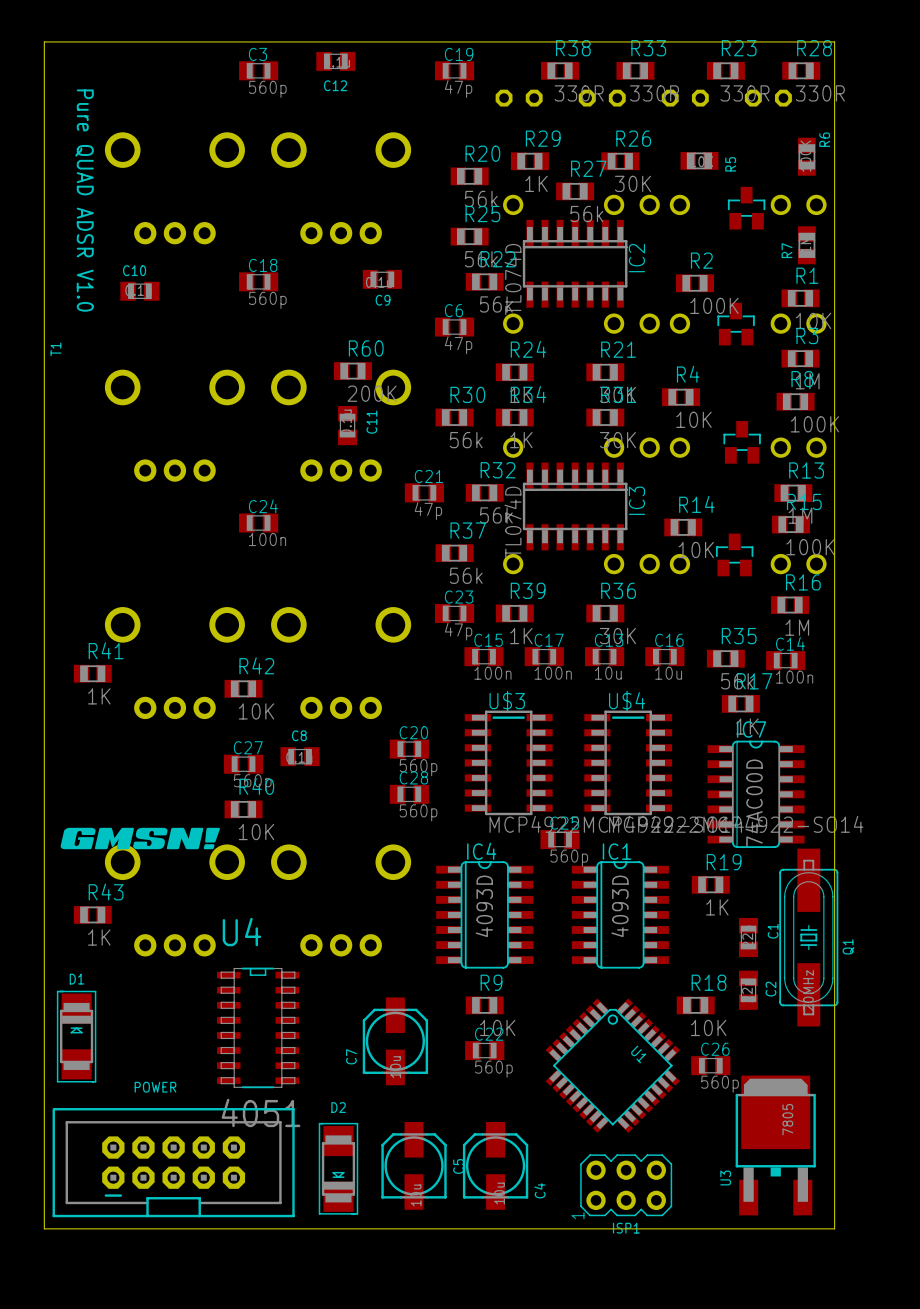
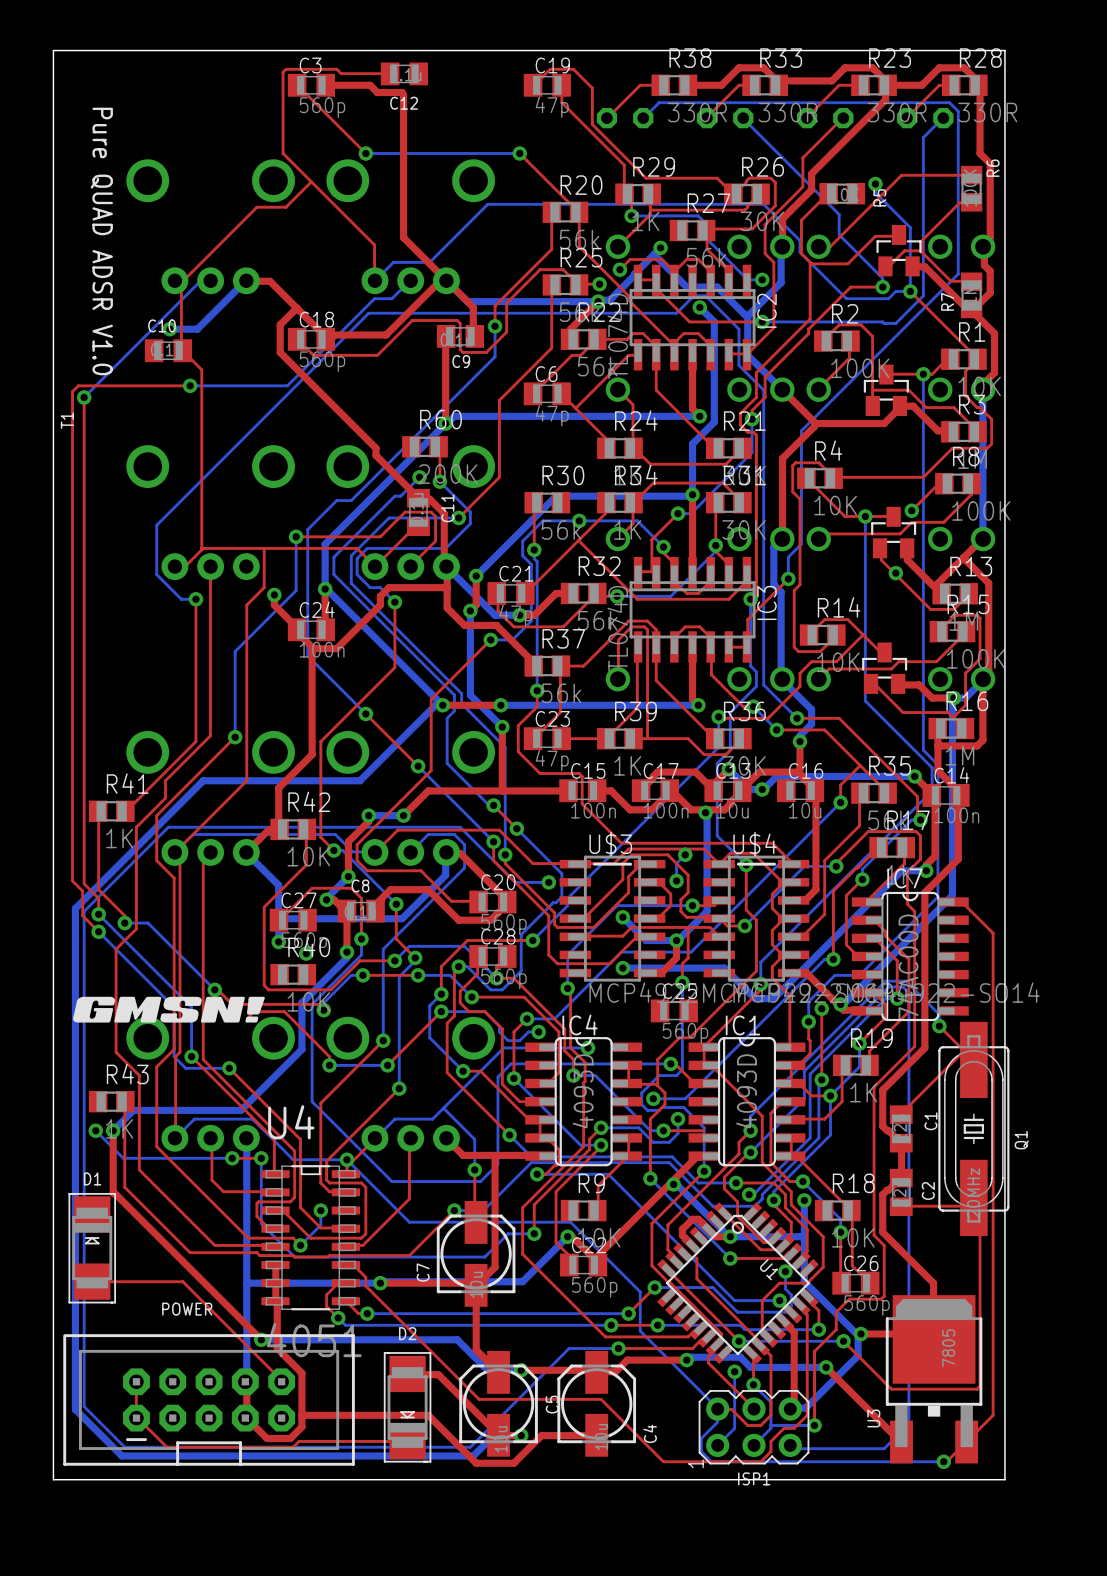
top track: none -> (390, 73) (341, 73) (336, 69) (285, 69) (283, 72) (283, 153) (374, 244) (374, 280)
top track: none -> (297, 85) (365, 153)
top track: none -> (325, 85) (370, 85) (377, 92) (402, 92) (403, 237) (446, 280)
top track: none -> (533, 85) (550, 69) (573, 69) (592, 88) (592, 124) (646, 178) (717, 178) (733, 194) (749, 178) (770, 178) (775, 182) (775, 205) (752, 229) (707, 230)
top track: none -> (561, 85) (561, 102) (624, 165) (624, 194) (631, 199) (631, 215)
top track: none -> (660, 85) (640, 85) (606, 118)
top track: none -> (687, 85) (721, 85) (739, 67) (763, 67) (778, 82) (778, 85) (781, 80) (831, 80) (845, 67) (872, 67) (887, 82) (887, 85)
top track: none -> (751, 85) (739, 85) (706, 118)
top track: none -> (860, 85) (839, 85) (807, 118)
top track: none -> (887, 85) (921, 85) (939, 67) (964, 67) (977, 80) (977, 85) (980, 88) (980, 153) (990, 163) (990, 237) (983, 246) (984, 265) (990, 271) (990, 292) (974, 308) (971, 308) (994, 333) (994, 372) (984, 382) (983, 389)
top track: none -> (887, 85) (885, 88) (885, 99) (811, 173) (811, 189) (782, 218) (782, 246)
top track: none -> (951, 85) (939, 85) (907, 118)
bottom track: none -> (643, 118) (659, 102) (949, 102) (958, 111) (958, 274) (801, 430) (801, 544) (788, 557) (788, 578)
bottom track: none -> (743, 118) (839, 214) (839, 234) (882, 278) (882, 287)
top track: none -> (843, 118) (802, 157) (802, 186) (765, 224) (765, 253) (773, 262) (773, 327) (747, 354) (728, 354)
bottom track: none -> (943, 118) (923, 137) (923, 295) (895, 323) (762, 321)
bottom track: none -> (365, 153) (519, 153)
via: none -> (365, 153)
top track: none -> (519, 153) (579, 212) (579, 246) (628, 295) (628, 300) (673, 345) (674, 354) (673, 343) (683, 333) (698, 333) (709, 345) (710, 354)
via: none -> (519, 153)
top track: none -> (971, 175) (901, 175) (830, 246) (818, 246)
top track: none -> (311, 181) (285, 207) (256, 207) (179, 284) (174, 280) (181, 287) (181, 349) (201, 369) (202, 549)
bottom track: none -> (875, 184) (875, 192) (910, 227) (910, 291) (895, 291) (888, 298) (846, 298) (799, 252) (799, 240) (763, 204) (487, 204) (429, 262) (393, 262) (374, 280)
via: none -> (875, 184)
top track: none -> (828, 193) (801, 220) (801, 253) (811, 263) (847, 263) (875, 236) (899, 234)
top track: none -> (651, 194) (650, 214) (617, 246)
top track: none -> (760, 194) (744, 210) (650, 210)
top track: none -> (971, 202) (959, 202) (921, 240) (921, 251)
top track: none -> (551, 212) (551, 249) (495, 305) (495, 326)
bottom track: none -> (631, 215) (698, 215) (709, 227) (709, 242) (747, 279) (762, 279)
via: none -> (631, 215)
top track: none -> (707, 230) (707, 249) (728, 271) (728, 280)
bottom track: none -> (782, 246) (781, 282) (747, 316)
bottom track: none -> (660, 247) (609, 300) (467, 301) (446, 280)
via: none -> (660, 247)
bottom track: none -> (654, 254) (686, 287) (717, 287) (747, 316)
top track: none -> (810, 263) (810, 319) (756, 372) (756, 397) (740, 413) (740, 425) (747, 432) (753, 432) (756, 435) (756, 593) (750, 599)
top track: none -> (885, 266) (890, 265) (904, 250) (920, 250) (951, 281) (971, 281)
top track: none -> (912, 266) (924, 266) (966, 308) (971, 308)
top track: none -> (619, 269) (630, 259) (662, 259) (672, 269) (675, 269) (674, 280) (675, 271) (686, 259) (698, 259) (709, 271) (710, 280)
via: none -> (619, 269)
top track: none -> (638, 280) (656, 279) (656, 288) (689, 321) (762, 321)
via: none -> (762, 279)
bottom track: none -> (210, 280) (200, 281) (84, 397)
top track: none -> (246, 280) (270, 281) (325, 336) (325, 339) (328, 335) (386, 335) (441, 279) (446, 280)
bottom track: none -> (246, 280) (197, 329) (169, 329)
bottom track: none -> (410, 280) (391, 298) (374, 298) (287, 385) (190, 385)
top track: none -> (446, 280) (473, 307) (474, 336)
top track: none -> (551, 284) (551, 348) (499, 400) (499, 477) (458, 517)
top track: none -> (599, 284) (579, 284) (563, 269) (540, 269) (506, 303) (506, 332) (486, 352) (463, 352) (460, 349) (460, 323) (457, 320) (412, 320) (377, 355) (313, 355) (297, 339)
via: none -> (599, 284)
top track: none -> (882, 287) (850, 287) (808, 329) (808, 333) (765, 377) (765, 397) (752, 410) (752, 419)
via: none -> (882, 287)
top track: none -> (910, 291) (977, 358) (965, 371) (965, 396) (991, 419) (991, 443) (987, 448) (952, 448) (923, 477) (833, 478) (818, 462) (795, 462) (792, 465) (792, 491) (799, 499) (799, 584) (794, 590) (794, 647) (798, 651) (820, 651) (836, 635)
via: none -> (910, 291)
top track: none -> (598, 301) (570, 329) (570, 339)
via: none -> (598, 301)
top track: none -> (296, 308) (280, 324) (280, 352) (376, 448) (376, 455) (418, 498) (429, 499) (444, 513) (444, 564) (447, 567) (447, 607) (464, 625) (496, 625) (532, 661) (533, 666)
bottom track: none -> (699, 307) (714, 321) (714, 422) (692, 443) (692, 494) (556, 496) (476, 576)
via: none -> (699, 307)
bottom track: none -> (747, 316) (747, 355) (782, 389)
via: none -> (762, 321)
bottom track: none -> (495, 326) (495, 356) (351, 500) (336, 500) (307, 529) (307, 655) (365, 713)
via: none -> (495, 326)
via: none -> (169, 329)
top track: none -> (446, 336) (445, 423)
top track: none -> (823, 340) (839, 324) (860, 324) (872, 336) (872, 405)
top track: none -> (850, 341) (849, 358) (818, 389)
top track: none -> (638, 354) (628, 355) (575, 408)
top track: none -> (692, 354) (692, 409) (699, 416)
top track: none -> (950, 359) (946, 359) (932, 374) (886, 374)
bottom track: none -> (923, 374) (923, 750) (937, 764) (937, 896) (859, 975) (834, 975) (808, 1001) (808, 1021)
via: none -> (923, 374)
top track: none -> (190, 385) (78, 385) (72, 391) (72, 880) (82, 891) (82, 915) (98, 931)
via: none -> (190, 385)
top track: none -> (617, 389) (633, 404) (633, 448) (650, 464) (725, 464) (742, 448)
top track: none -> (782, 389) (815, 423)
bottom track: none -> (983, 389) (983, 539)
top track: none -> (872, 390) (908, 390) (926, 407) (953, 407) (977, 431)
top track: none -> (533, 393) (572, 355) (580, 355) (596, 339) (627, 339) (633, 333) (643, 333) (656, 346) (656, 390) (715, 448)
top track: none -> (561, 393) (605, 438) (606, 448)
top track: none -> (84, 397) (84, 883) (98, 898) (98, 914)
via: none -> (84, 397)
bottom track: none -> (699, 416) (454, 416) (325, 544) (325, 589) (442, 705) (436, 703) (360, 780) (203, 780) (75, 908) (75, 1409) (121, 1455) (473, 1455) (493, 1435) (521, 1435)
via: none -> (699, 416)
bottom track: none -> (752, 419) (752, 452) (691, 513) (678, 513)
via: none -> (752, 419)
via: none -> (445, 423)
top track: none -> (815, 423) (884, 423) (899, 405) (913, 406) (937, 430) (950, 431)
top track: none -> (815, 423) (782, 458) (782, 539)
top track: none -> (438, 446) (439, 481)
bottom track: none -> (419, 477) (400, 496) (394, 496) (333, 557) (333, 574) (454, 695) (454, 711) (447, 718) (447, 763) (489, 805) (493, 805)
via: none -> (419, 477)
top track: none -> (806, 478) (845, 516) (893, 516)
bottom track: none -> (439, 481) (470, 512) (470, 523) (445, 548) (367, 548) (357, 558) (357, 574) (370, 587) (380, 587) (394, 602)
via: none -> (439, 481)
top track: none -> (944, 483) (937, 484) (911, 510)
top track: none -> (971, 483) (971, 494) (943, 522) (911, 522) (900, 533) (823, 533) (818, 539)
top track: none -> (692, 494) (692, 572)
via: none -> (692, 494)
top track: none -> (533, 502) (534, 549)
top track: none -> (606, 502) (605, 513) (525, 593)
top track: none -> (715, 502) (715, 551) (728, 564) (728, 572)
top track: none -> (742, 502) (723, 483) (653, 483) (633, 503) (633, 523) (617, 539)
via: none -> (911, 510)
top track: none -> (678, 513) (651, 539) (651, 571)
via: none -> (678, 513)
bottom track: none -> (865, 516) (865, 700) (932, 767) (932, 790) (760, 962) (760, 984)
via: none -> (865, 516)
bottom track: none -> (458, 517) (389, 517) (351, 555) (351, 583) (461, 693) (461, 703) (505, 747) (505, 854)
via: none -> (458, 517)
via: none -> (579, 520)
top track: none -> (418, 526) (413, 528) (374, 566) (357, 548) (203, 548) (185, 565) (174, 566)
top track: none -> (296, 536) (380, 536) (405, 512) (431, 512) (435, 516) (435, 541) (410, 566)
bottom track: none -> (296, 536) (296, 590) (235, 651) (235, 737)
via: none -> (296, 536)
bottom track: none -> (782, 539) (773, 547) (773, 584) (781, 592) (781, 679) (811, 709) (811, 724) (799, 735) (799, 741)
top track: none -> (983, 539) (936, 584) (941, 593) (907, 560) (907, 548)
top track: none -> (578, 540) (637, 599) (728, 599) (746, 581) (747, 572)
bottom track: none -> (715, 545) (715, 551) (670, 596) (617, 596)
via: none -> (715, 545)
top track: none -> (663, 547) (663, 552) (673, 562) (675, 581) (686, 593) (698, 593) (709, 581) (710, 572)
bottom track: none -> (663, 547) (637, 520) (542, 520) (522, 541) (522, 555) (531, 564) (531, 621) (512, 639) (490, 639)
via: none -> (663, 547)
top track: none -> (264, 548) (264, 587) (246, 605) (246, 780) (174, 852) (179, 857) (179, 1052) (175, 1056) (174, 1138)
top track: none -> (880, 548) (881, 560) (930, 609) (953, 609) (968, 593)
bottom track: none -> (534, 549) (534, 558) (537, 561) (537, 690)
via: none -> (534, 549)
top track: none -> (963, 557) (988, 583) (988, 671) (982, 680) (982, 740) (977, 745) (937, 745)
top track: none -> (210, 566) (210, 735) (165, 780) (165, 798) (136, 827) (136, 928) (116, 949) (116, 1052) (139, 1075) (139, 1169) (214, 1245) (275, 1246)
bottom track: none -> (446, 566) (495, 615) (519, 615)
top track: none -> (638, 572) (656, 572)
via: none -> (895, 573)
top track: none -> (476, 576) (476, 605) (470, 610)
via: none -> (476, 576)
top track: none -> (788, 578) (747, 619) (747, 646) (728, 647)
via: none -> (788, 578)
top track: none -> (447, 587) (389, 587) (380, 596) (380, 605) (336, 648) (313, 648)
top track: none -> (325, 589) (325, 629)
via: none -> (325, 589)
top track: none -> (496, 593) (497, 610) (513, 626) (563, 626) (596, 593) (601, 596) (617, 596)
top track: none -> (570, 593) (556, 593) (534, 615) (519, 615)
top track: none -> (274, 594) (274, 605) (296, 626) (297, 632) (313, 648)
via: none -> (274, 594)
via: none -> (617, 596)
top track: none -> (195, 599) (195, 741) (125, 811)
bottom track: none -> (195, 599) (181, 599) (156, 574) (156, 525) (368, 313) (676, 313) (694, 295) (705, 295) (739, 329) (739, 365) (763, 390) (763, 684) (797, 718)
via: none -> (195, 599)
bottom track: none -> (750, 599) (750, 666) (756, 671) (756, 686) (730, 712) (730, 750) (717, 763) (717, 835) (746, 865)
via: none -> (750, 599)
top track: none -> (394, 602) (394, 667) (320, 741) (320, 837) (333, 850)
via: none -> (394, 602)
bottom track: none -> (470, 610) (470, 695) (502, 727)
via: none -> (470, 610)
via: none -> (519, 615)
top track: none -> (938, 631) (955, 615) (977, 615) (980, 618) (980, 658) (965, 673) (965, 705) (953, 717)
top track: none -> (966, 631) (936, 661) (898, 661) (891, 668) (829, 668) (818, 679)
top track: none -> (809, 635) (824, 619) (847, 619) (879, 651) (884, 652)
top track: none -> (863, 634) (836, 661) (811, 661) (799, 673) (799, 686) (768, 718) (718, 716)
top track: none -> (490, 639) (431, 699) (431, 770) (357, 844) (357, 860) (367, 870) (421, 870) (451, 901) (478, 902)
via: none -> (490, 639)
top track: none -> (638, 646) (637, 708) (606, 738) (561, 738)
top track: none -> (674, 646) (675, 637) (685, 626) (699, 626) (709, 637) (711, 674) (743, 706) (753, 706)
top track: none -> (692, 646) (692, 699) (698, 705)
top track: none -> (313, 648) (312, 754) (278, 788) (279, 829) (268, 830) (246, 852)
top track: none -> (617, 679) (618, 639) (631, 626) (644, 626) (647, 629) (647, 738)
bottom track: none -> (983, 679) (965, 698) (953, 698) (952, 700) (952, 895) (843, 1004) (840, 1004)
top track: none -> (871, 683) (875, 684) (903, 712) (948, 712) (964, 728)
top track: none -> (898, 683) (919, 684) (932, 698) (953, 698)
top track: none -> (537, 690) (537, 706) (518, 725) (518, 751) (540, 773) (579, 773) (582, 776) (582, 804) (621, 843) (772, 843) (793, 864)
via: none -> (537, 690)
via: none -> (953, 698)
top track: none -> (442, 705) (500, 705)
via: none -> (442, 705)
bottom track: none -> (500, 705) (698, 705)
via: none -> (500, 705)
via: none -> (698, 705)
bottom track: none -> (753, 706) (776, 729)
via: none -> (753, 706)
top track: none -> (365, 713) (418, 766)
via: none -> (365, 713)
bottom track: none -> (718, 716) (718, 747) (567, 898) (567, 905) (532, 940)
via: none -> (718, 716)
top track: none -> (797, 718) (839, 718) (917, 796) (917, 817) (920, 819)
via: none -> (797, 718)
top track: none -> (502, 727) (502, 790)
via: none -> (502, 727)
top track: none -> (937, 728) (937, 770) (959, 792) (960, 795) (958, 798) (958, 859) (924, 892) (924, 1047) (882, 1090) (882, 1126) (901, 1143) (901, 1177) (882, 1194) (882, 1232) (933, 1283) (934, 1339) (930, 1334) (860, 1334)
top track: none -> (776, 729) (824, 729) (887, 793)
via: none -> (776, 729)
top track: none -> (235, 737) (156, 815) (156, 860) (174, 878) (174, 1049) (156, 1066) (156, 1146) (248, 1238) (293, 1238) (300, 1245)
via: none -> (235, 737)
top track: none -> (533, 738) (560, 712) (560, 666) (583, 666) (628, 621) (647, 621) (656, 629) (656, 680) (715, 738)
top track: none -> (633, 738) (688, 738) (704, 754) (725, 754) (742, 738)
top track: none -> (799, 741) (798, 772)
via: none -> (799, 741)
top track: none -> (860, 765) (840, 785) (840, 802)
bottom track: none -> (418, 766) (493, 841)
via: none -> (418, 766)
top track: none -> (728, 769) (712, 785) (713, 790) (695, 772) (657, 772) (641, 790)
bottom track: none -> (728, 769) (749, 789) (762, 789) (776, 776) (914, 776)
via: none -> (728, 769)
top track: none -> (798, 772) (814, 789) (815, 793) (815, 889) (805, 899) (793, 900)
top track: none -> (798, 772) (759, 772) (724, 809) (691, 809) (673, 792) (669, 790) (651, 809) (630, 809) (611, 790) (597, 790)
top track: none -> (914, 776) (930, 792) (930, 795) (935, 796) (935, 856) (926, 865) (926, 870)
via: none -> (914, 776)
via: none -> (762, 789)
top track: none -> (568, 790) (428, 790) (403, 815)
top track: none -> (860, 793) (859, 825) (824, 860) (824, 914) (802, 936) (793, 936)
bottom track: none -> (840, 802) (691, 952) (621, 952) (554, 1018) (527, 1018)
via: none -> (840, 802)
top track: none -> (493, 805) (516, 828)
via: none -> (493, 805)
top track: none -> (98, 811) (98, 889) (124, 915) (124, 923)
bottom track: none -> (705, 812) (707, 911) (676, 940) (646, 940) (622, 917)
via: none -> (705, 812)
top track: none -> (368, 815) (368, 821) (348, 841) (348, 876)
bottom track: none -> (368, 815) (403, 815)
via: none -> (368, 815)
via: none -> (403, 815)
bottom track: none -> (920, 819) (911, 819) (862, 869) (862, 879)
via: none -> (920, 819)
top track: none -> (306, 829) (306, 865) (264, 907) (264, 985) (268, 989) (330, 989) (360, 960) (394, 960)
bottom track: none -> (516, 828) (561, 873) (561, 896) (556, 902) (553, 902) (521, 934) (521, 971) (502, 989) (490, 989) (467, 966) (458, 966)
via: none -> (516, 828)
top track: none -> (493, 841) (493, 860) (548, 915) (548, 955) (557, 963) (609, 963) (635, 937) (649, 936)
via: none -> (493, 841)
top track: none -> (878, 847) (833, 891) (833, 959)
top track: none -> (905, 847) (904, 863) (866, 902)
bottom track: none -> (333, 850) (342, 850) (396, 904)
via: none -> (333, 850)
bottom track: none -> (174, 852) (193, 834) (335, 834) (352, 851) (374, 852)
top track: none -> (210, 852) (203, 860) (203, 1059) (294, 1151) (294, 1197) (290, 1201) (256, 1203) (256, 1216) (268, 1228) (275, 1228)
bottom track: none -> (246, 852) (278, 885) (278, 941)
top track: none -> (374, 852) (397, 830) (499, 830) (532, 863) (614, 863) (628, 849) (704, 849) (719, 864) (730, 853) (753, 853) (782, 882) (793, 882) (784, 882) (772, 894) (772, 908) (782, 918) (793, 918) (784, 918) (772, 930) (772, 944) (782, 955) (793, 954) (784, 955) (772, 966) (772, 978) (789, 995) (790, 1047)
bottom track: none -> (410, 852) (428, 834) (454, 834) (464, 844) (464, 867) (383, 949) (383, 1040)
top track: none -> (446, 852) (460, 853) (506, 899) (508, 902) (490, 920) (458, 920) (428, 889) (390, 889) (376, 904) (375, 911)
bottom track: none -> (446, 852) (445, 875) (402, 918) (278, 918)
top track: none -> (505, 854) (505, 863) (554, 912) (554, 924) (557, 927) (593, 927) (628, 892) (628, 876) (640, 865) (649, 864)
via: none -> (505, 854)
bottom track: none -> (685, 854) (676, 863) (676, 880)
via: none -> (685, 854)
top track: none -> (746, 865) (746, 910) (756, 920) (756, 971) (689, 1037) (679, 1037) (657, 1059) (656, 1084)
via: none -> (746, 865)
top track: none -> (836, 866) (836, 863) (868, 831) (916, 831) (920, 835) (920, 859) (907, 872) (907, 904) (914, 911) (914, 1046) (874, 1087) (874, 1235) (884, 1245) (884, 1296) (881, 1299) (849, 1299) (836, 1312) (836, 1329) (814, 1351) (814, 1425)
bottom track: none -> (836, 866) (804, 866) (744, 925)
via: none -> (836, 866)
bottom track: none -> (926, 870) (901, 870) (773, 998) (754, 998) (724, 968) (622, 968)
via: none -> (926, 870)
bottom track: none -> (348, 876) (326, 899)
via: none -> (348, 876)
top track: none -> (862, 879) (846, 895) (846, 944) (858, 956) (866, 956)
via: none -> (862, 879)
via: none -> (676, 880)
bottom track: none -> (548, 882) (515, 882) (460, 827) (168, 827) (84, 911) (84, 1406) (124, 1447) (470, 1447) (569, 1348) (618, 1348)
via: none -> (548, 882)
top track: none -> (649, 882) (659, 882) (670, 894) (670, 905) (659, 917) (649, 918)
top track: none -> (326, 899) (333, 899) (347, 911) (346, 952)
via: none -> (326, 899)
top track: none -> (719, 900) (714, 905) (692, 905)
top track: none -> (954, 902) (962, 902) (993, 933) (993, 1415) (946, 1461) (943, 1461)
top track: none -> (396, 904) (396, 939) (415, 957)
via: none -> (396, 904)
bottom track: none -> (692, 905) (617, 905) (567, 955) (567, 988)
via: none -> (692, 905)
bottom track: none -> (98, 914) (191, 1007) (191, 1056)
via: none -> (98, 914)
via: none -> (622, 917)
top track: none -> (575, 918) (585, 917) (622, 879) (622, 863) (631, 854) (667, 854) (688, 875) (688, 892) (680, 899) (680, 911) (686, 917) (718, 917) (727, 925) (744, 925)
top track: none -> (278, 920) (312, 888) (351, 888) (361, 898) (361, 939)
top track: none -> (866, 920) (874, 920) (885, 931) (885, 936) (908, 959) (908, 1011) (869, 1050) (869, 1065)
bottom track: none -> (124, 923) (148, 923) (214, 989)
via: none -> (124, 923)
via: none -> (744, 925)
top track: none -> (688, 927) (688, 957) (682, 963) (682, 982)
bottom track: none -> (98, 931) (174, 1007) (174, 1056) (185, 1068) (229, 1068)
via: none -> (98, 931)
top track: none -> (575, 936) (622, 936) (631, 927) (709, 927) (719, 936)
bottom track: none -> (361, 939) (361, 955) (312, 1004) (312, 1101) (391, 1181) (480, 1181) (497, 1164) (497, 1076) (511, 1063) (670, 1063)
via: none -> (361, 939)
top track: none -> (866, 938) (875, 939) (897, 960) (897, 998)
top track: none -> (532, 940) (467, 940) (441, 966) (441, 994)
via: none -> (532, 940)
top track: none -> (676, 940) (676, 957) (662, 972) (649, 973)
via: none -> (676, 940)
via: none -> (278, 941)
bottom track: none -> (346, 952) (346, 957) (301, 1002) (301, 1049) (240, 1110) (133, 1110) (113, 1130)
via: none -> (346, 952)
via: none -> (306, 953)
top track: none -> (478, 956) (477, 973) (460, 991) (460, 1002) (468, 1011) (484, 1011) (502, 1029) (502, 1084) (519, 1101) (539, 1101)
top track: none -> (507, 956) (496, 966) (496, 978) (513, 978) (564, 1029) (564, 1050) (573, 1059) (573, 1075)
bottom track: none -> (415, 957) (415, 960) (399, 976) (399, 1088)
via: none -> (415, 957)
bottom track: none -> (833, 959) (824, 959) (685, 1098) (653, 1098)
via: none -> (833, 959)
bottom track: none -> (394, 960) (409, 946) (464, 946) (496, 978)
via: none -> (394, 960)
top track: none -> (458, 966) (454, 971) (454, 1016) (447, 1023) (447, 1072) (509, 1135)
via: none -> (458, 966)
via: none -> (622, 968)
top track: none -> (793, 973) (807, 973) (843, 1010) (866, 1010)
top track: none -> (362, 975) (418, 975)
bottom track: none -> (362, 975) (351, 975) (323, 1002) (323, 1010)
via: none -> (362, 975)
bottom track: none -> (418, 975) (450, 975) (471, 997)
via: none -> (418, 975)
via: none -> (496, 978)
bottom track: none -> (682, 982) (682, 1069) (676, 1075) (659, 1075) (641, 1092) (641, 1104) (647, 1110) (659, 1110) (662, 1107) (683, 1107) (704, 1127) (704, 1171)
via: none -> (682, 982)
top track: none -> (760, 984) (760, 989) (703, 1047) (704, 1065)
via: none -> (760, 984)
top track: none -> (567, 988) (570, 991) (570, 1047) (585, 1062) (583, 1146) (522, 1207) (522, 1254) (605, 1336) (688, 1336) (694, 1331) (698, 1330)
via: none -> (567, 988)
top track: none -> (214, 989) (217, 989) (232, 1004) (317, 1004) (323, 1010)
via: none -> (214, 989)
top track: none -> (866, 992) (874, 992) (885, 1004) (885, 1017) (859, 1043)
bottom track: none -> (441, 994) (429, 1005) (429, 1037) (463, 1071)
via: none -> (441, 994)
top track: none -> (471, 997) (524, 997) (558, 1031) (558, 1072) (548, 1082) (539, 1083)
via: none -> (471, 997)
bottom track: none -> (897, 998) (885, 998) (810, 1074) (810, 1137) (753, 1194) (749, 1194)
via: none -> (897, 998)
via: none -> (840, 1004)
top track: none -> (821, 1008) (821, 1079)
via: none -> (821, 1008)
via: none -> (323, 1010)
top track: none -> (441, 1011) (387, 1065)
bottom track: none -> (441, 1011) (484, 1011) (499, 1026) (499, 1031) (508, 1040) (519, 1040) (528, 1031) (538, 1031)
via: none -> (441, 1011)
top track: none -> (249, 1016) (254, 1011) (284, 1011) (329, 1056) (329, 1065)
top track: none -> (527, 1018) (513, 1031) (513, 1078)
via: none -> (527, 1018)
top track: none -> (808, 1021) (810, 1053) (798, 1065) (790, 1065)
via: none -> (808, 1021)
top track: none -> (939, 1026) (973, 1059) (964, 1050) (901, 1114)
bottom track: none -> (939, 1026) (939, 1014) (905, 981) (885, 981) (750, 1116) (750, 1130)
via: none -> (939, 1026)
via: none -> (538, 1031)
top track: none -> (383, 1040) (320, 1103) (320, 1182) (329, 1191) (345, 1192)
via: none -> (383, 1040)
bottom track: none -> (859, 1043) (859, 1066) (830, 1095) (830, 1135) (773, 1191) (773, 1200)
via: none -> (859, 1043)
bottom track: none -> (588, 1047) (503, 1047) (432, 1119) (394, 1119) (374, 1138)
via: none -> (588, 1047)
top track: none -> (191, 1056) (274, 1139) (275, 1174)
via: none -> (191, 1056)
top track: none -> (670, 1063) (675, 1063) (694, 1082) (703, 1083)
via: none -> (670, 1063)
bottom track: none -> (329, 1065) (387, 1065)
via: none -> (329, 1065)
via: none -> (387, 1065)
top track: none -> (627, 1065) (627, 1083) (656, 1084) (664, 1092) (664, 1104) (650, 1119) (650, 1178)
top track: none -> (703, 1065) (711, 1065) (762, 1116) (762, 1162) (791, 1191) (791, 1204) (823, 1236) (823, 1267) (807, 1283) (779, 1283) (762, 1300) (762, 1328) (768, 1334) (769, 1338)
top track: none -> (791, 1065) (790, 1083) (798, 1082) (811, 1095) (830, 1095)
top track: none -> (842, 1065) (842, 1101) (824, 1119) (790, 1119)
top track: none -> (229, 1068) (300, 1139) (300, 1207) (320, 1228) (345, 1228)
via: none -> (229, 1068)
top track: none -> (463, 1071) (480, 1071) (528, 1119) (539, 1119) (540, 1137)
via: none -> (463, 1071)
bottom track: none -> (573, 1075) (595, 1075) (650, 1130) (663, 1130)
via: none -> (573, 1075)
bottom track: none -> (513, 1078) (580, 1145) (601, 1145)
via: none -> (513, 1078)
bottom track: none -> (821, 1079) (818, 1082) (818, 1137) (762, 1194) (762, 1198) (754, 1206) (712, 1206) (669, 1162) (531, 1162) (483, 1210) (454, 1210)
via: none -> (821, 1079)
top track: none -> (399, 1088) (326, 1161) (326, 1180) (329, 1182) (361, 1182) (365, 1187) (365, 1233) (361, 1238) (310, 1238) (283, 1210) (275, 1210)
via: none -> (399, 1088)
via: none -> (830, 1095)
via: none -> (653, 1098)
top track: none -> (125, 1101) (124, 1187) (190, 1252) (256, 1252) (259, 1255) (294, 1257) (409, 1255) (454, 1210)
top track: none -> (790, 1101) (782, 1101) (770, 1113) (770, 1162) (789, 1181) (802, 1181)
bottom track: none -> (443, 1108) (474, 1139) (474, 1169)
bottom track: none -> (678, 1119) (678, 1133) (669, 1142) (653, 1142) (638, 1127) (601, 1127)
via: none -> (678, 1119)
top track: none -> (601, 1127) (589, 1139) (589, 1149) (534, 1204) (534, 1233)
via: none -> (601, 1127)
bottom track: none -> (95, 1130) (123, 1158) (232, 1158)
via: none -> (95, 1130)
top track: none -> (113, 1130) (113, 1193) (261, 1339)
via: none -> (113, 1130)
top track: none -> (663, 1130) (704, 1130)
via: none -> (663, 1130)
top track: none -> (750, 1130) (739, 1142) (739, 1153) (667, 1225) (667, 1249) (673, 1255) (674, 1260)
via: none -> (750, 1130)
bottom track: none -> (509, 1135) (531, 1156) (672, 1156) (698, 1182) (736, 1182)
via: none -> (509, 1135)
bottom track: none -> (174, 1138) (194, 1119) (252, 1119) (293, 1159) (346, 1159) (409, 1222) (570, 1222) (640, 1291) (640, 1331) (717, 1408) (717, 1422) (701, 1438) (701, 1451) (711, 1461) (943, 1461)
top track: none -> (210, 1138) (211, 1180) (223, 1191) (275, 1192)
bottom track: none -> (246, 1138) (245, 1381)
top track: none -> (374, 1138) (346, 1167) (345, 1174)
top track: none -> (410, 1138) (409, 1198) (362, 1245) (345, 1246)
top track: none -> (446, 1138) (463, 1155) (539, 1156)
top track: none -> (539, 1137) (547, 1137) (558, 1149) (558, 1162) (545, 1174) (537, 1174)
top track: none -> (627, 1137) (628, 1155) (598, 1185) (597, 1210)
top track: none -> (790, 1137) (790, 1156) (795, 1155) (852, 1210) (852, 1265) (870, 1283)
top track: none -> (601, 1145) (556, 1191) (556, 1242) (569, 1255) (569, 1265)
via: none -> (601, 1145)
top track: none -> (750, 1152) (724, 1177) (724, 1188) (737, 1201) (737, 1216) (763, 1242) (777, 1235)
bottom track: none -> (750, 1152) (804, 1098) (804, 1071) (888, 986) (903, 986) (908, 992) (908, 1424) (884, 1448) (794, 1448) (790, 1445)
via: none -> (750, 1152)
top track: none -> (495, 1155) (495, 1267) (476, 1285)
top track: none -> (703, 1156) (696, 1156) (596, 1257) (597, 1265) (596, 1261) (570, 1235) (567, 1236)
top track: none -> (232, 1158) (261, 1158)
via: none -> (232, 1158)
bottom track: none -> (261, 1158) (261, 1223) (294, 1257) (484, 1257) (508, 1233) (534, 1233)
via: none -> (261, 1158)
via: none -> (346, 1159)
top track: none -> (474, 1169) (476, 1222)
via: none -> (474, 1169)
top track: none -> (704, 1171) (651, 1223) (651, 1265) (721, 1334) (721, 1336) (715, 1342) (714, 1351) (708, 1357) (708, 1363) (754, 1409)
via: none -> (704, 1171)
bottom track: none -> (537, 1174) (608, 1174) (734, 1300) (779, 1300)
via: none -> (537, 1174)
bottom track: none -> (650, 1178) (730, 1258)
via: none -> (650, 1178)
bottom track: none -> (802, 1181) (840, 1219) (840, 1232)
via: none -> (802, 1181)
top track: none -> (736, 1182) (773, 1182) (785, 1194) (785, 1207) (807, 1229) (807, 1251) (801, 1260)
via: none -> (736, 1182)
bottom track: none -> (673, 1184) (676, 1184) (730, 1236) (804, 1236)
via: none -> (673, 1184)
via: none -> (749, 1194)
top track: none -> (773, 1200) (773, 1204) (791, 1222) (791, 1233) (785, 1239) (785, 1243) (778, 1249) (760, 1249) (722, 1211)
via: none -> (773, 1200)
bottom track: none -> (804, 1200) (804, 1281) (858, 1335)
via: none -> (804, 1200)
top track: none -> (901, 1206) (965, 1206) (973, 1197) (980, 1204) (980, 1386) (977, 1389) (891, 1389) (843, 1341)
bottom track: none -> (320, 1210) (320, 1225) (300, 1245)
via: none -> (320, 1210)
via: none -> (454, 1210)
top track: none -> (840, 1232) (841, 1283)
via: none -> (840, 1232)
via: none -> (534, 1233)
bottom track: none -> (567, 1236) (522, 1281) (246, 1283)
via: none -> (567, 1236)
top track: none -> (730, 1236) (715, 1236) (698, 1219) (692, 1219) (682, 1229) (682, 1235) (690, 1243)
via: none -> (730, 1236)
via: none -> (300, 1245)
top track: none -> (793, 1251) (788, 1252) (782, 1258) (730, 1258)
top track: none -> (696, 1257) (696, 1278) (760, 1342) (761, 1346) (770, 1355) (770, 1415) (760, 1425) (747, 1425) (731, 1409) (717, 1409)
via: none -> (730, 1258)
top track: none -> (275, 1264) (277, 1348) (301, 1373) (301, 1426) (290, 1438) (267, 1438) (245, 1418) (245, 1381)
top track: none -> (345, 1264) (354, 1265) (365, 1277) (365, 1286) (479, 1399) (601, 1399) (663, 1461) (760, 1461) (770, 1451) (770, 1441) (784, 1428) (794, 1428) (807, 1415) (807, 1315) (801, 1306)
top track: none -> (666, 1268) (739, 1341)
bottom track: none -> (785, 1271) (785, 1288) (791, 1294) (791, 1306) (785, 1312) (737, 1312) (712, 1287) (654, 1287)
via: none -> (785, 1271)
top track: none -> (92, 1281) (182, 1281) (281, 1381)
top track: none -> (345, 1283) (338, 1283) (326, 1294) (326, 1306) (338, 1318)
top track: none -> (380, 1283) (473, 1283) (476, 1285)
via: none -> (380, 1283)
top track: none -> (476, 1285) (476, 1349) (498, 1372)
top track: none -> (654, 1287) (628, 1313)
via: none -> (654, 1287)
top track: none -> (809, 1298) (810, 1302) (818, 1310) (818, 1329)
top track: none -> (345, 1301) (358, 1313) (367, 1313)
via: none -> (779, 1300)
bottom track: none -> (367, 1313) (628, 1313)
via: none -> (367, 1313)
via: none -> (628, 1313)
bottom track: none -> (338, 1318) (345, 1325) (611, 1325)
via: none -> (338, 1318)
top track: none -> (785, 1322) (794, 1332) (794, 1405) (790, 1409)
top track: none -> (611, 1325) (657, 1325)
via: none -> (611, 1325)
bottom track: none -> (657, 1325) (740, 1325) (744, 1329) (818, 1329)
via: none -> (657, 1325)
via: none -> (818, 1329)
via: none -> (860, 1334)
bottom track: none -> (858, 1335) (858, 1355) (805, 1408) (790, 1409)
top track: none -> (706, 1338) (701, 1339) (692, 1348) (618, 1348)
bottom track: none -> (261, 1339) (457, 1339) (487, 1370) (521, 1370)
via: none -> (261, 1339)
bottom track: none -> (739, 1341) (843, 1341)
via: none -> (739, 1341)
via: none -> (843, 1341)
via: none -> (618, 1348)
top track: none -> (753, 1354) (753, 1384)
top track: none -> (686, 1360) (627, 1360) (615, 1371) (521, 1370)
bottom track: none -> (686, 1360) (689, 1357) (740, 1357) (750, 1367) (826, 1367)
via: none -> (686, 1360)
top track: none -> (826, 1367) (901, 1442)
via: none -> (826, 1367)
via: none -> (521, 1370)
bottom track: none -> (734, 1371) (734, 1428) (717, 1445)
via: none -> (734, 1371)
top track: none -> (407, 1373) (438, 1374) (498, 1435) (521, 1435)
top track: none -> (136, 1381) (136, 1418) (166, 1447) (293, 1447) (299, 1441) (407, 1441)
bottom track: none -> (753, 1384) (770, 1402) (770, 1428) (754, 1445)
via: none -> (753, 1384)
top track: none -> (301, 1415) (428, 1415) (476, 1463) (513, 1463) (541, 1435) (596, 1435)
bottom track: none -> (770, 1425) (814, 1425)
via: none -> (814, 1425)
via: none -> (521, 1435)
via: none -> (943, 1461)

